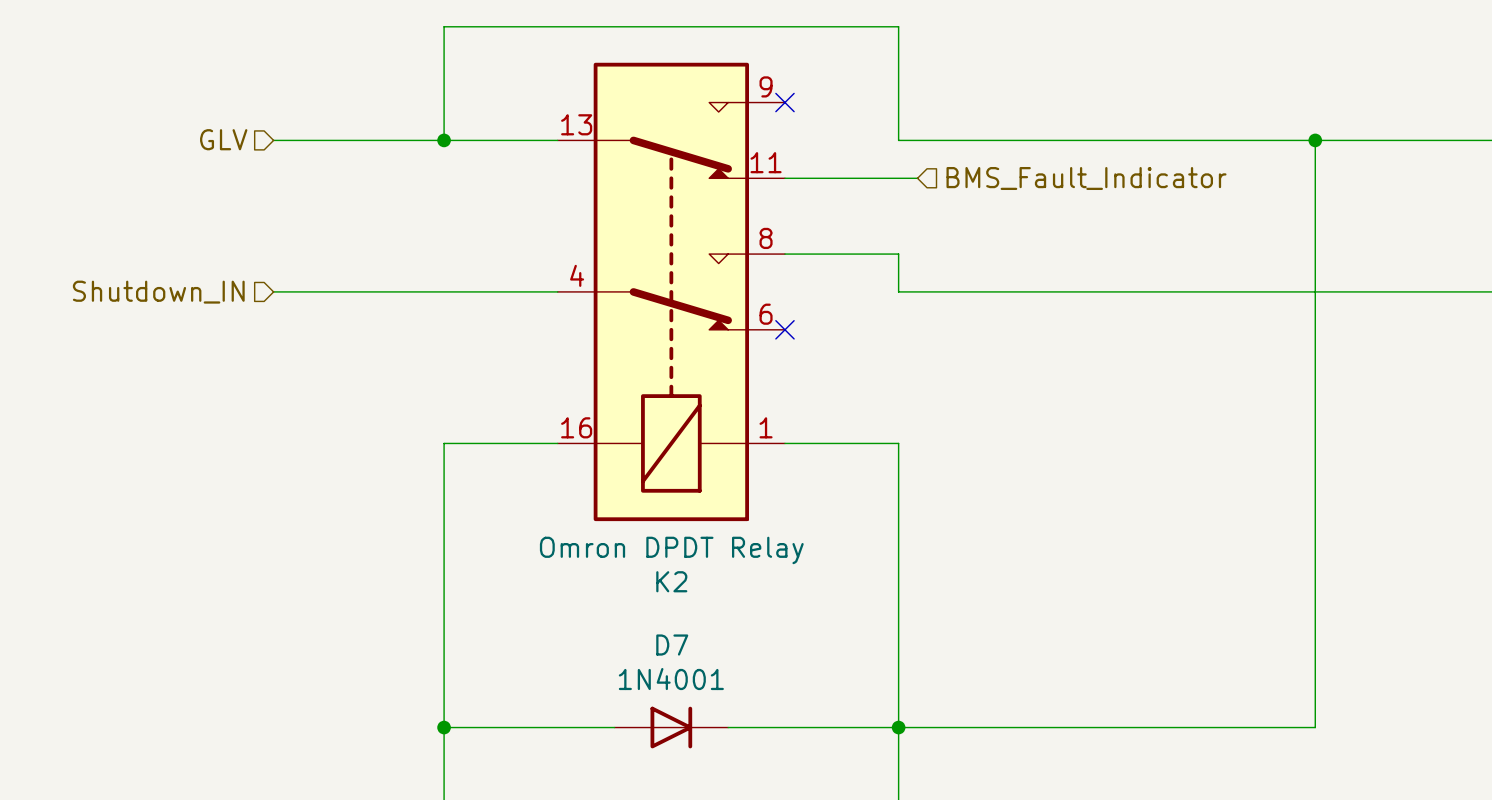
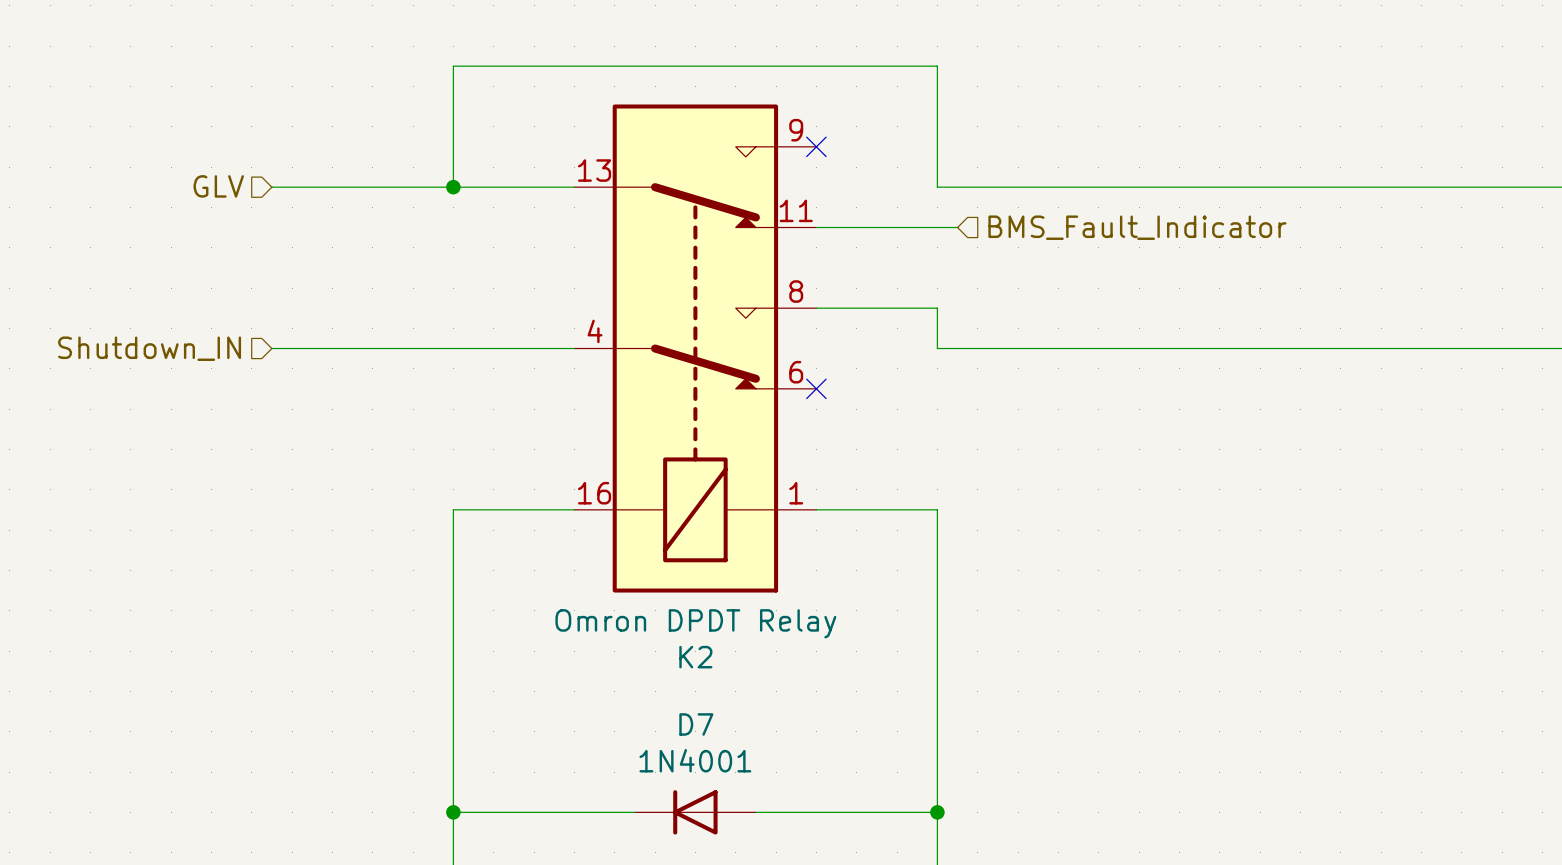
wire: (1315, 140) (1315, 727) (898, 727) -> none
junction: (1315, 140) -> none
D7 rotation: 0° (671, 727) -> 180° (695, 812)

